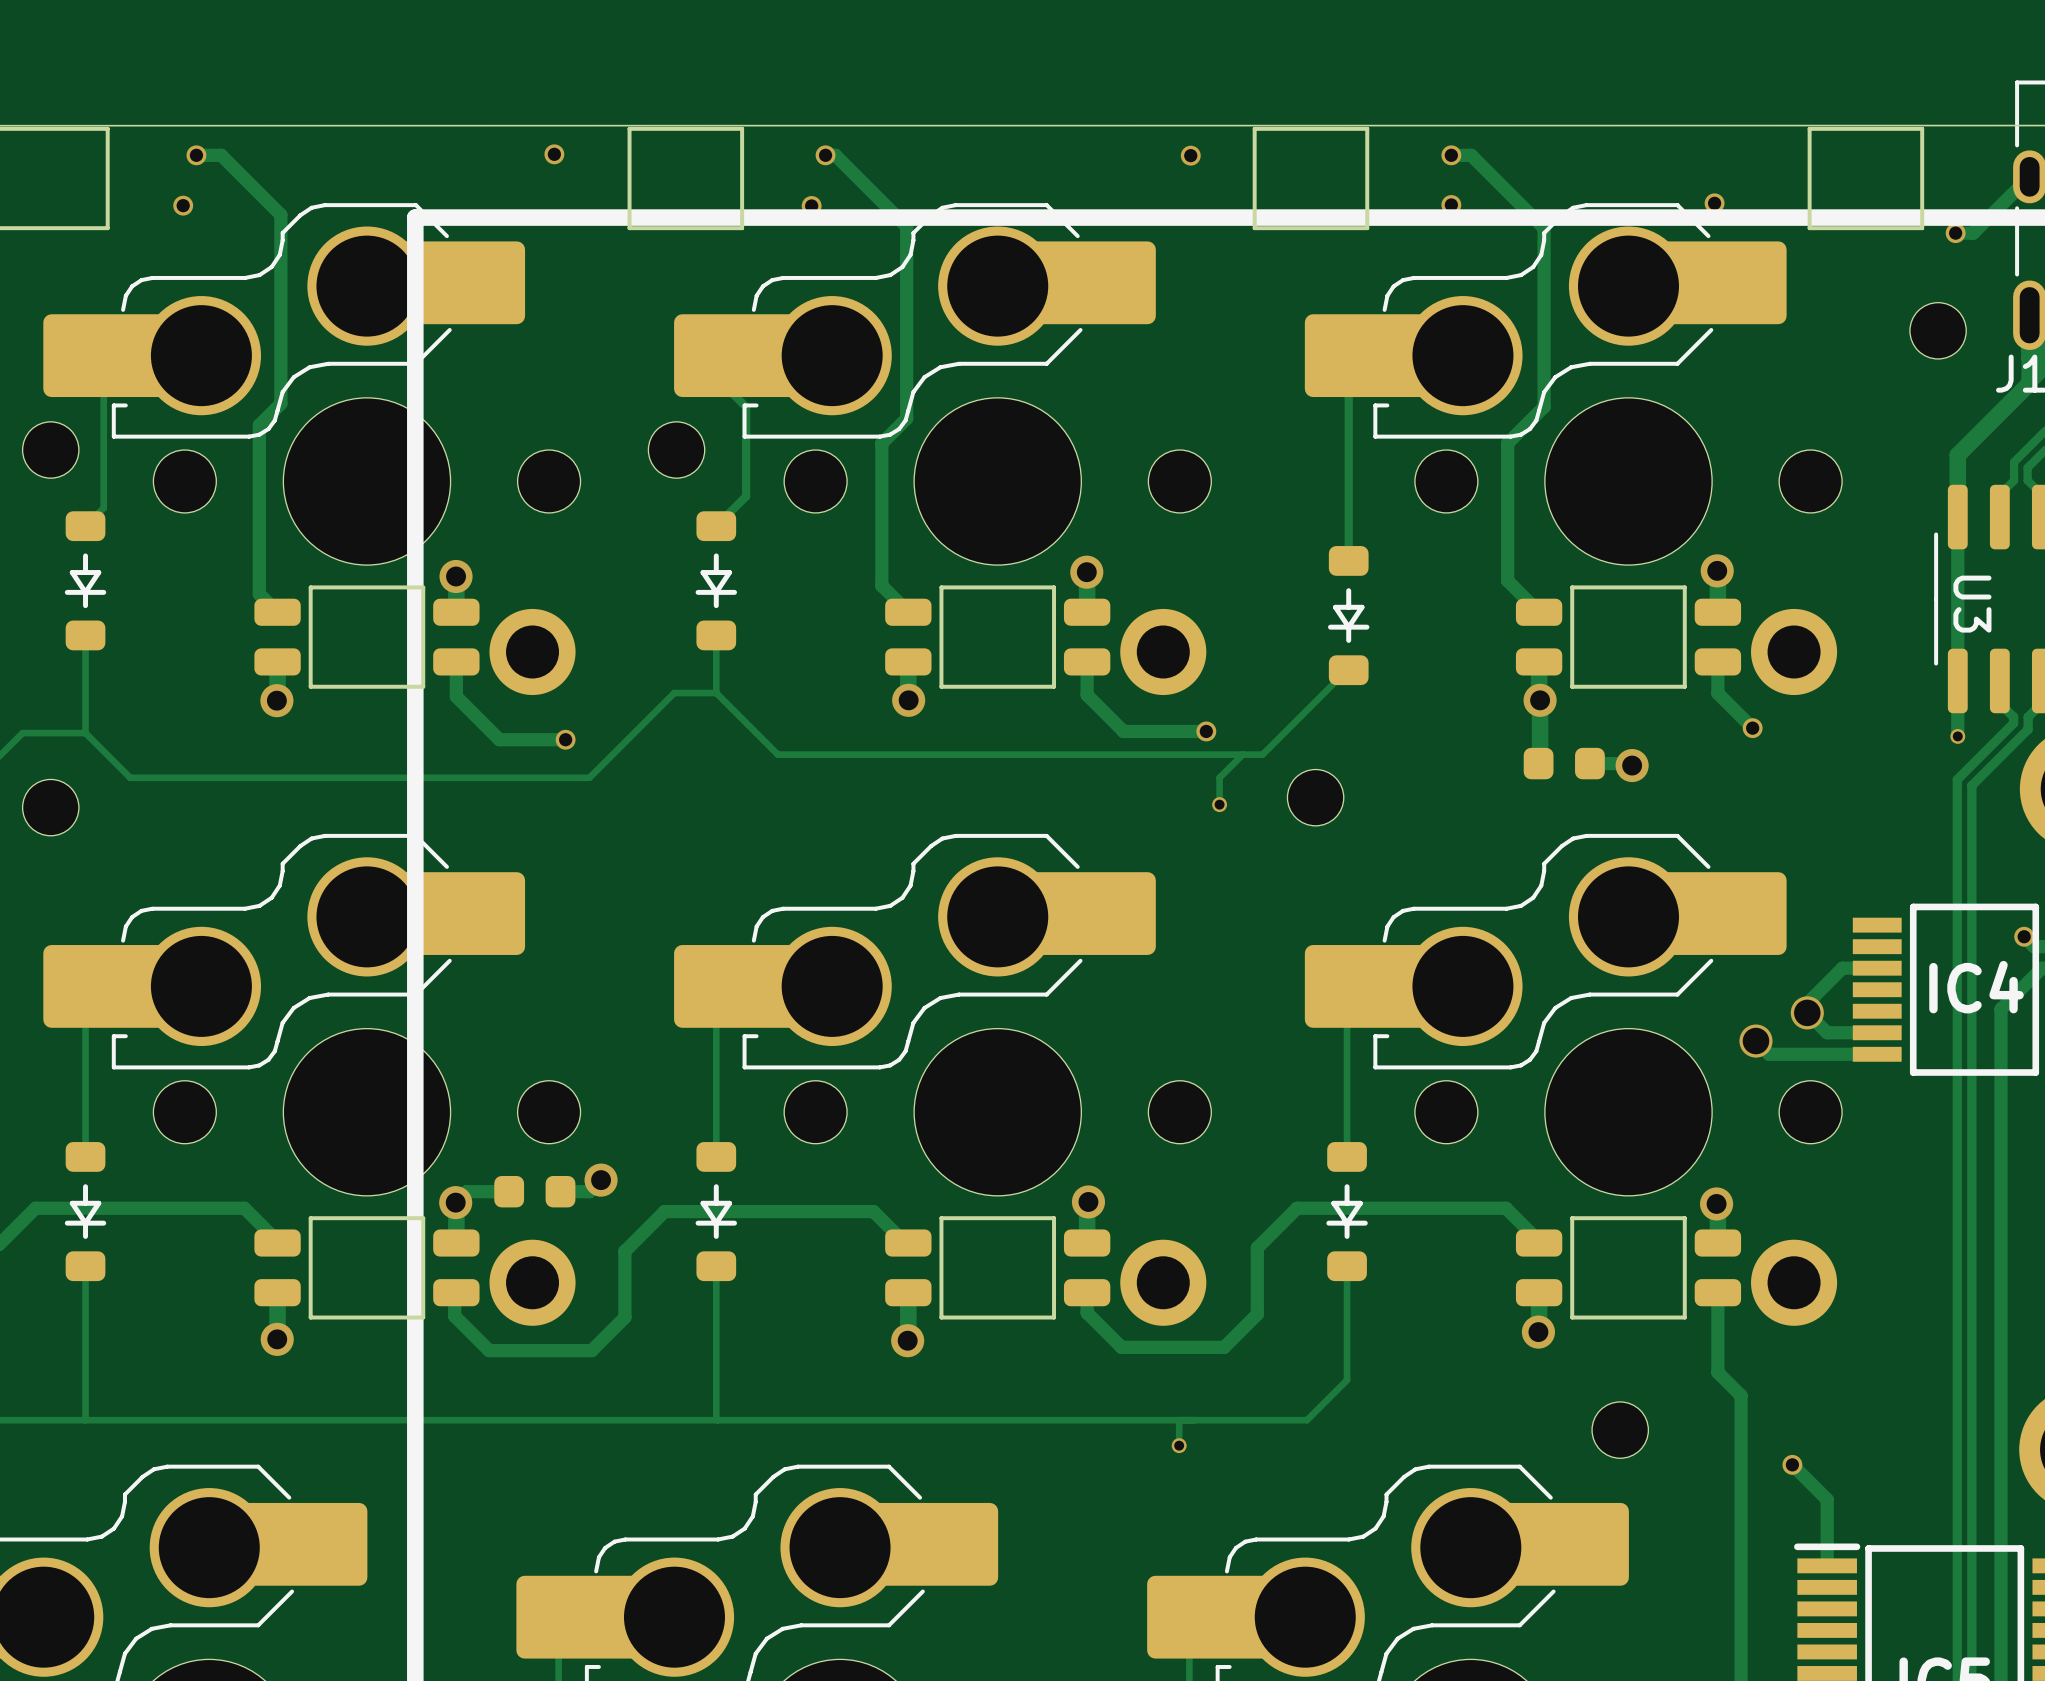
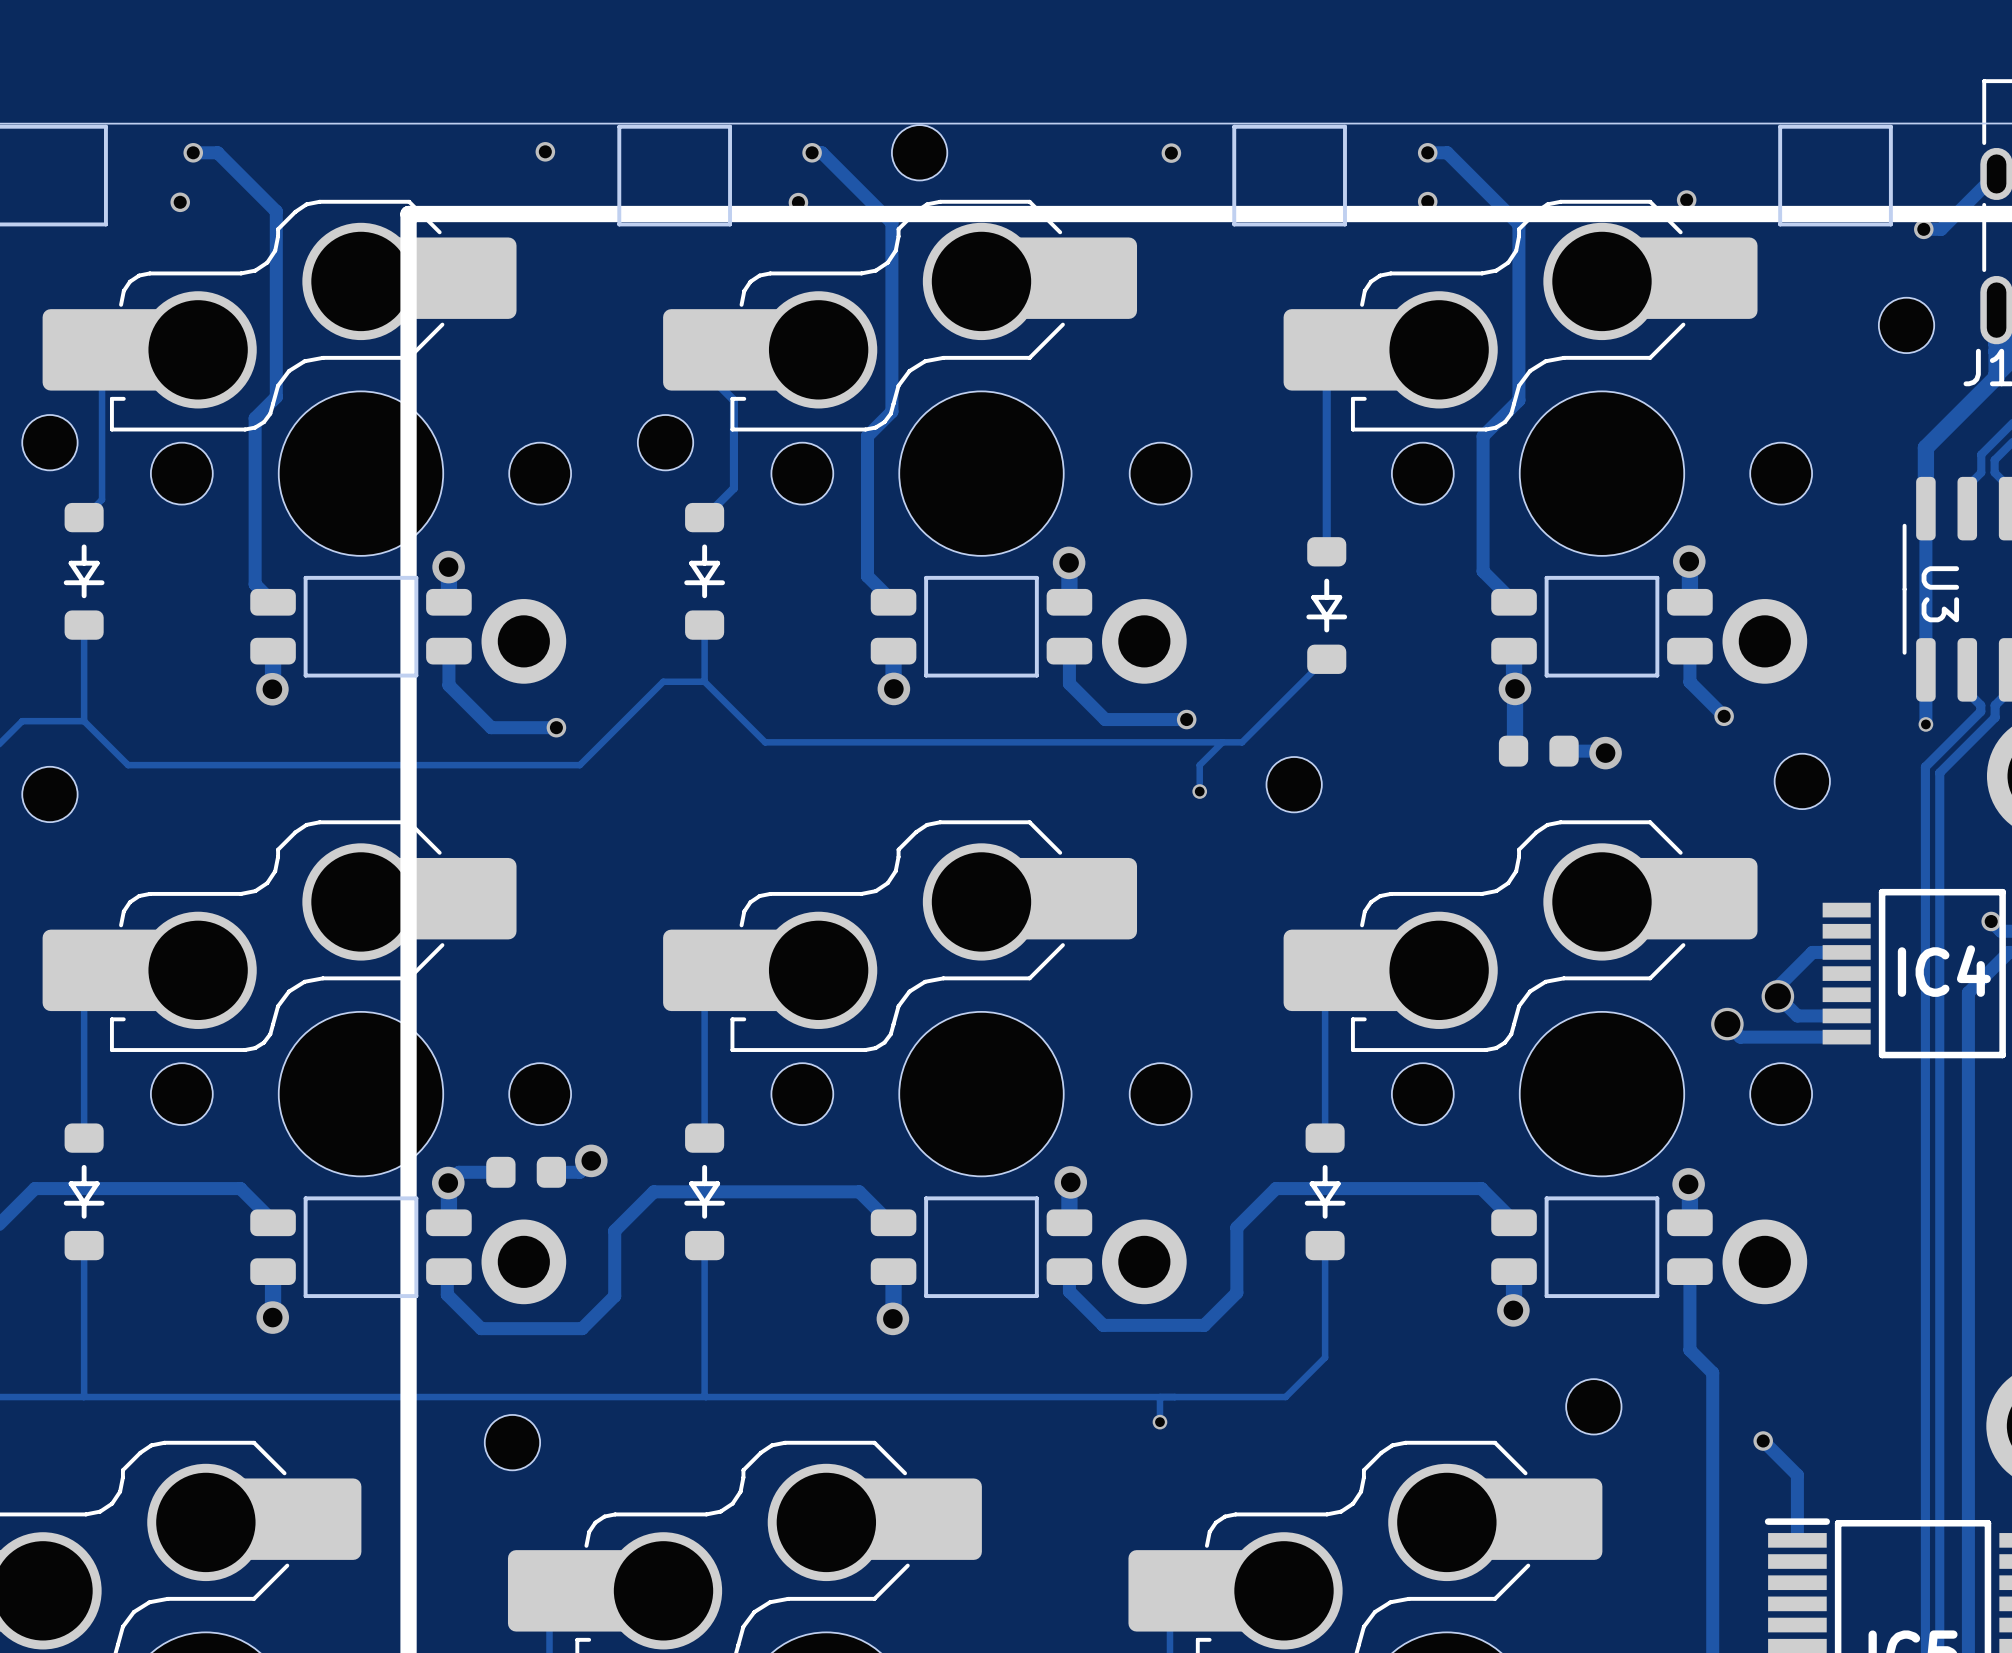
part: none -> (919, 152)
part: none -> (1802, 781)
part: none -> (512, 1442)

